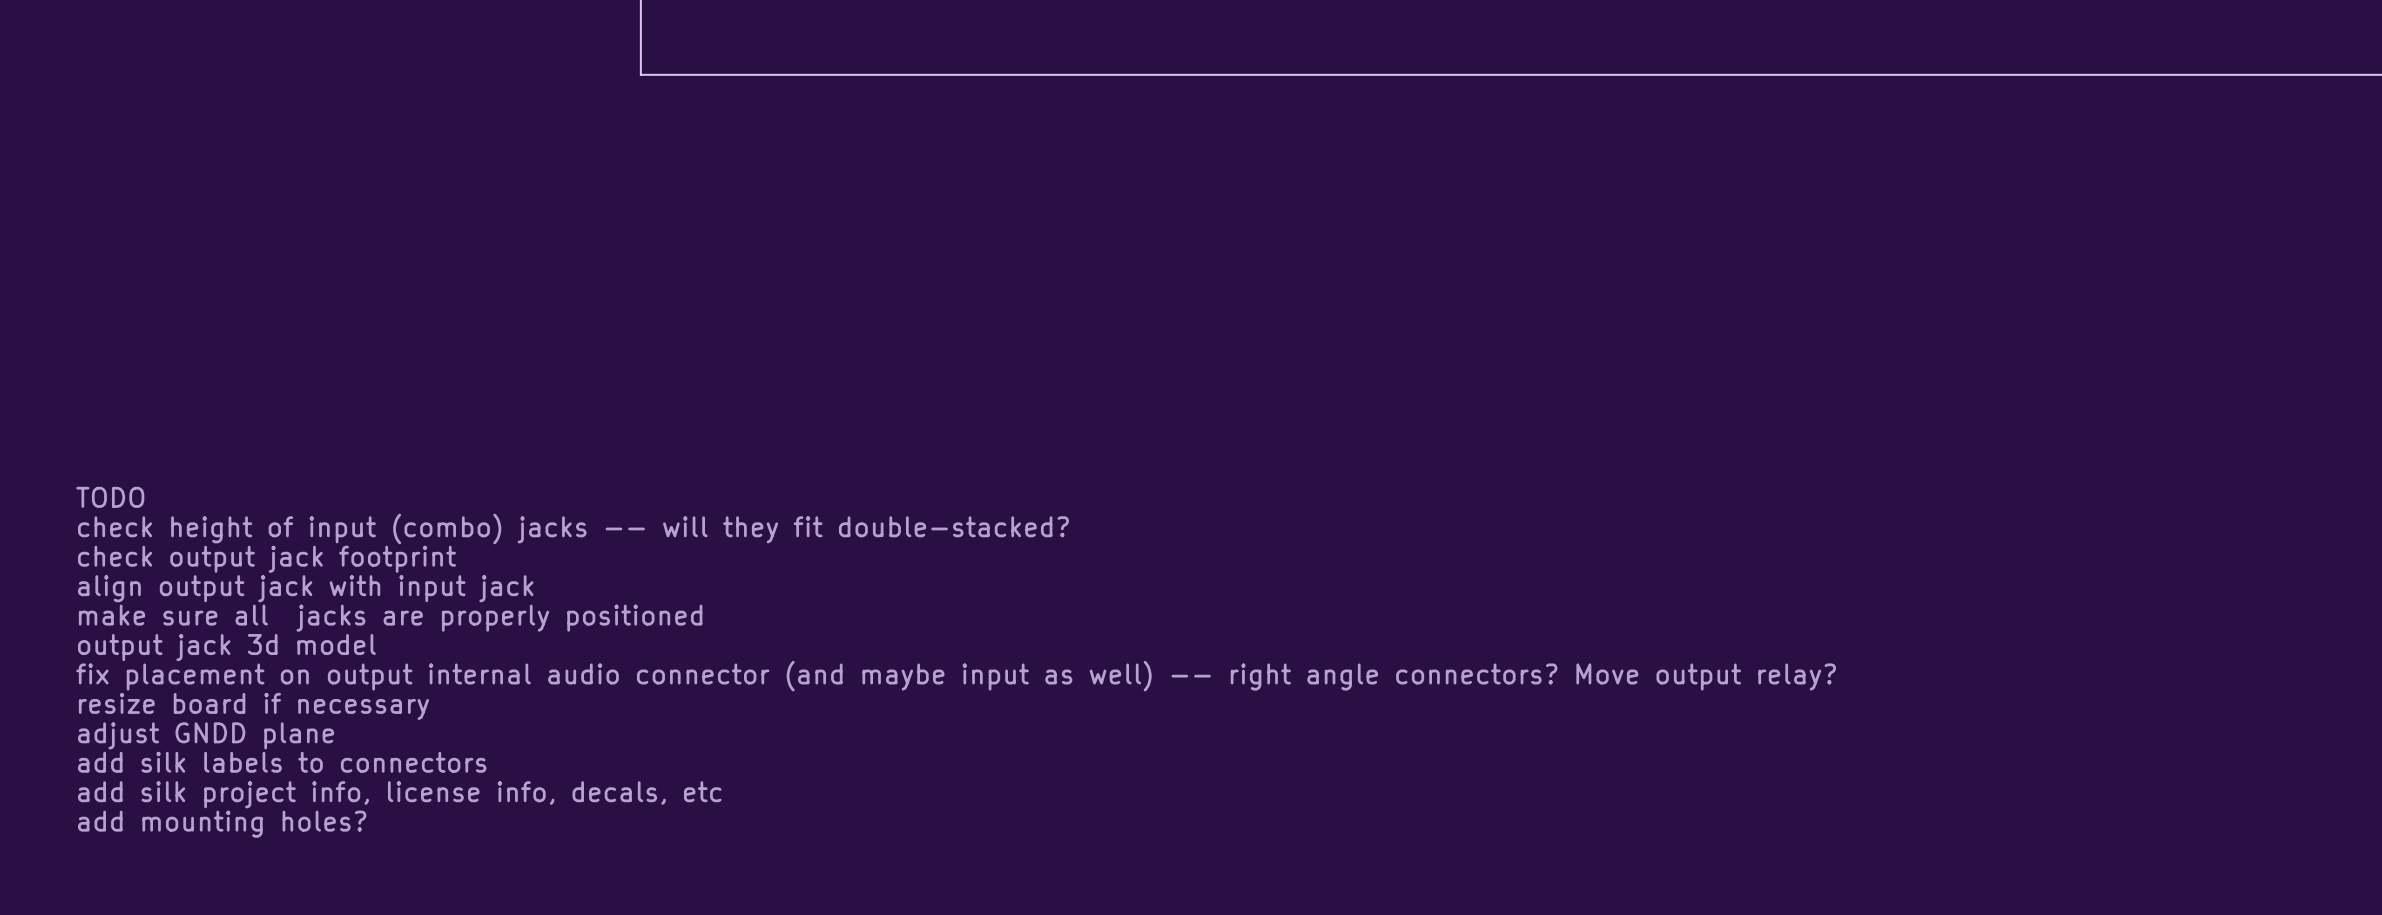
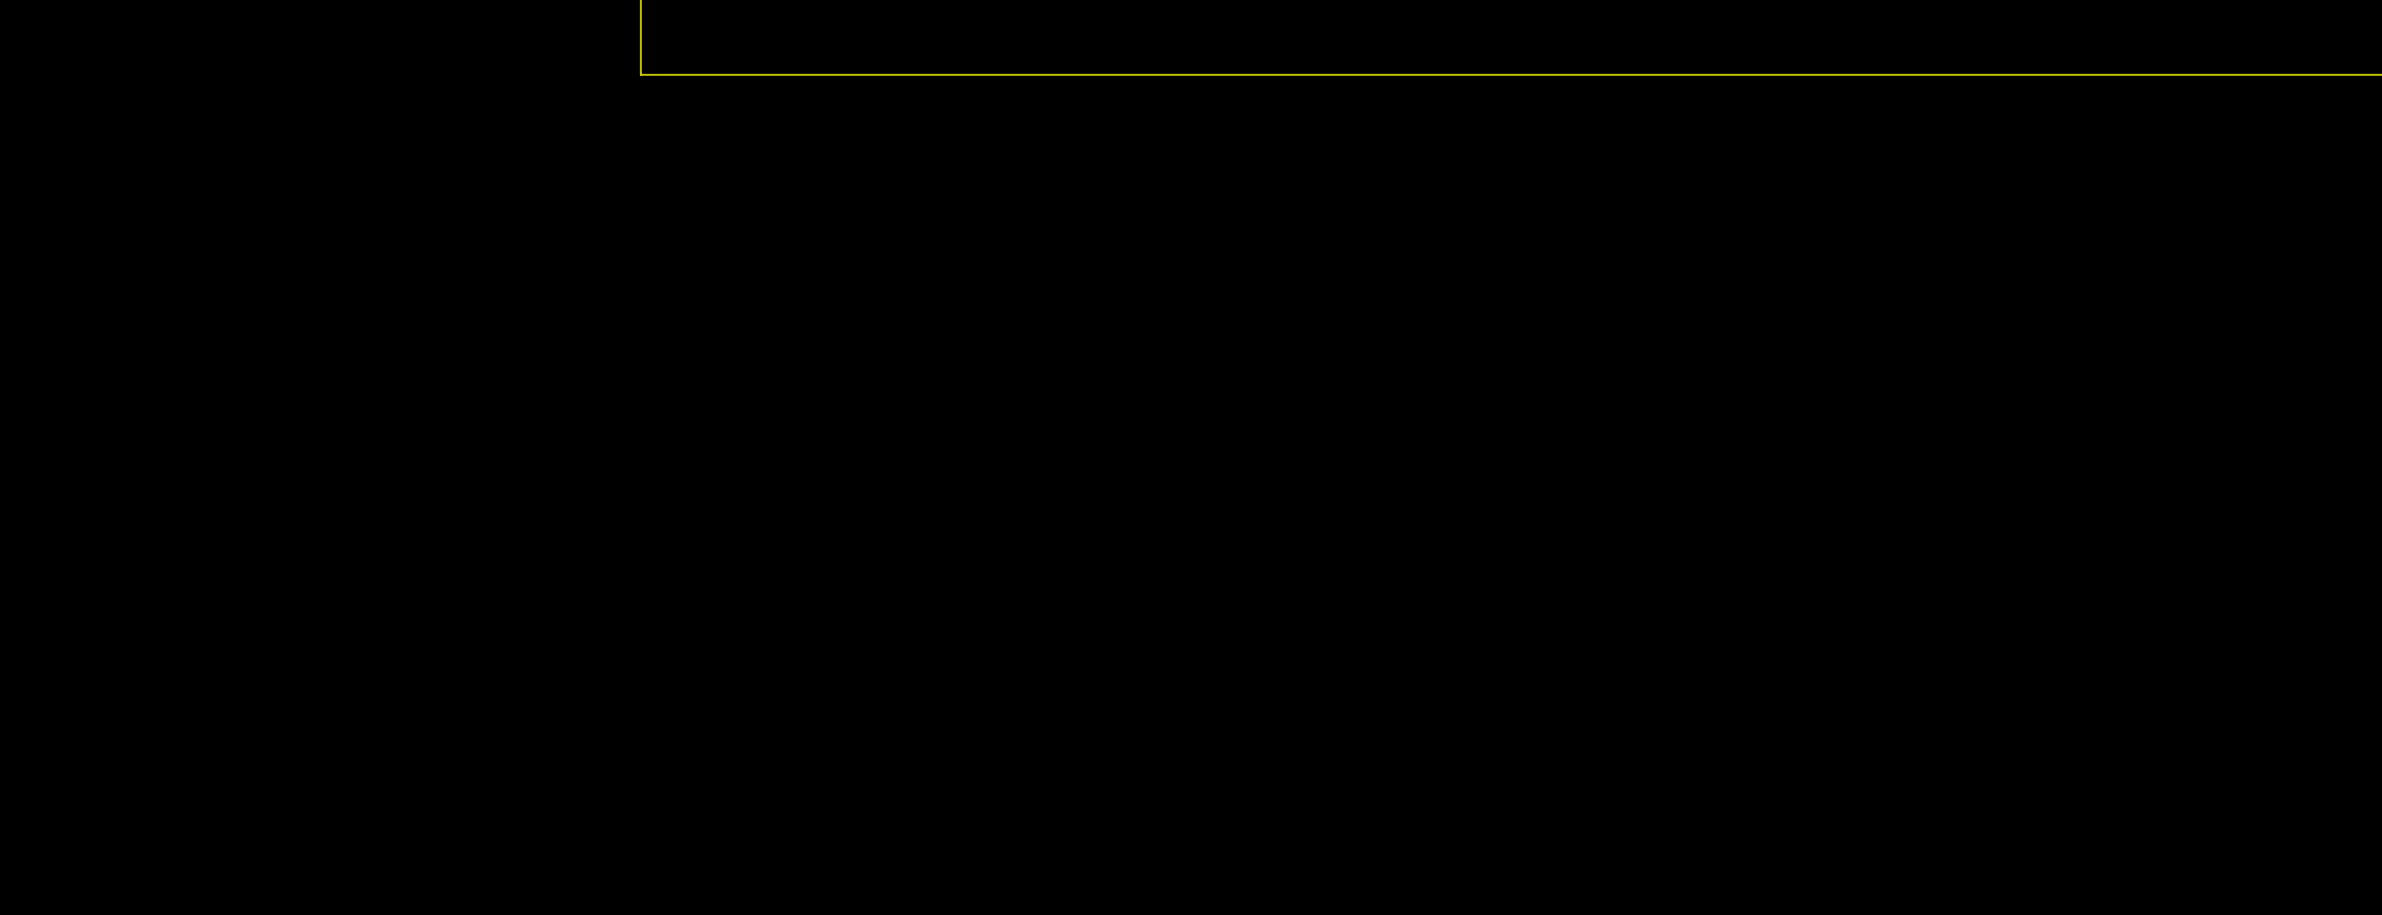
text: TODO (110, 497) -> none
text: check height of input (combo) jacks -- will they fit double-stacked? (573, 528) -> none
text: check output jack footprint (266, 559) -> none
text: align output jack with input jack (305, 588) -> none
text: make sure all jacks are properly positioned (390, 618) -> none
text: output jack 3d model (226, 647) -> none
text: fix placement on output internal audio connector (and maybe input as well) -- right angle connectors? Move output relay? (956, 676) -> none
text: resize board if necessary (253, 706) -> none
text: adjust GNDD plane (206, 735) -> none
text: add silk labels to connectors (282, 762) -> none
text: add silk project info, license info, decals, etc (399, 794) -> none
text: add mounting holes? (222, 824) -> none

